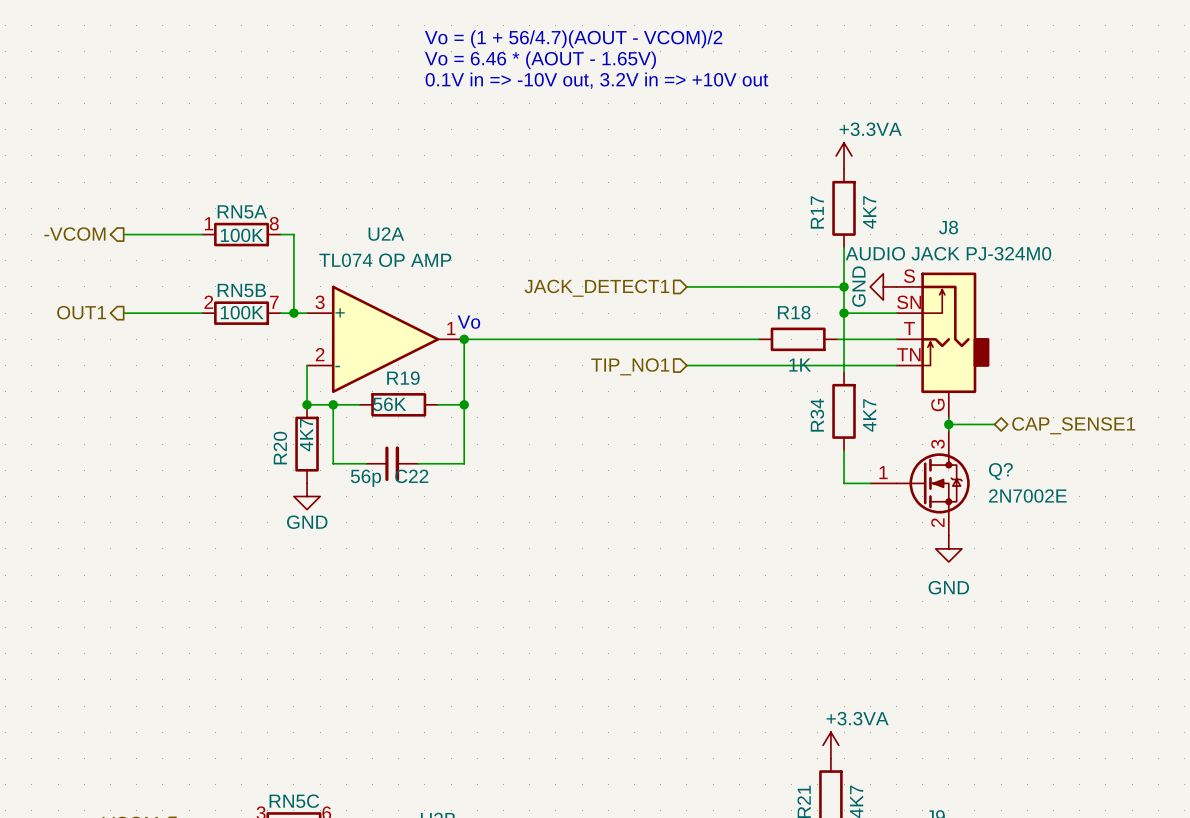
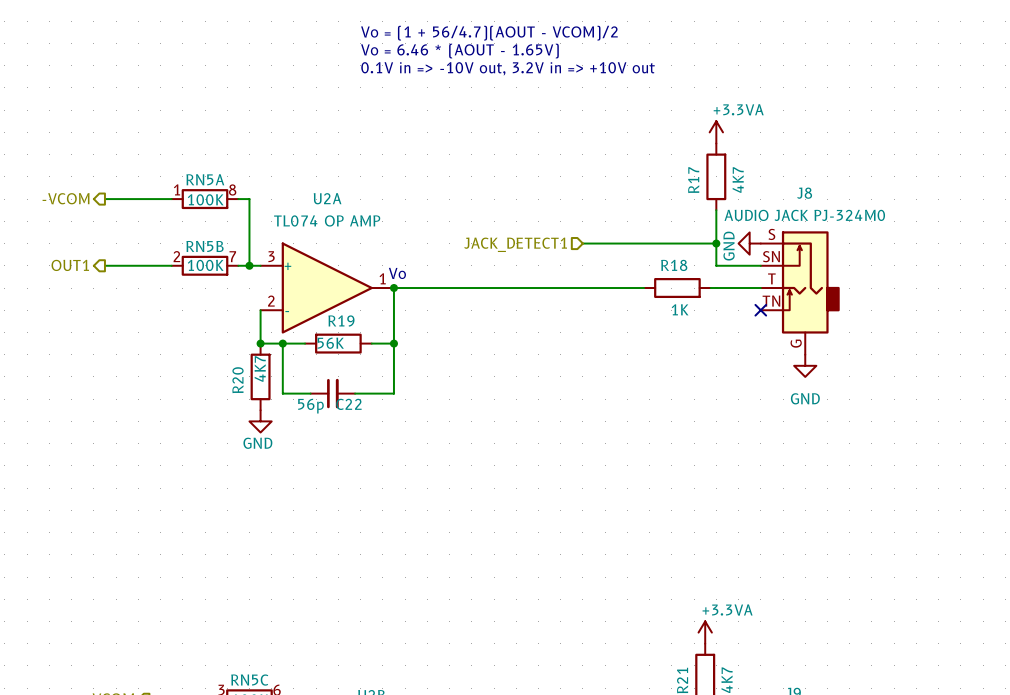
wire: (844, 313) (844, 372) -> none
junction: (844, 313) -> none
wire: (686, 365) (896, 365) -> none
no-connect mark: none -> (760, 310)
hierarchical label: TIP_NO1 (630, 366) -> none
R34: 4K7 (844, 411) -> none
wire: (948, 424) (994, 424) -> none
junction: (948, 424) -> none
hierarchical label: CAP_SENSE1 (1073, 425) -> none
wire: (844, 450) (844, 483) (870, 483) -> none
Q?: 2N7002E (919, 483) -> none
power symbol position: GND (948, 548) -> GND (805, 365)

